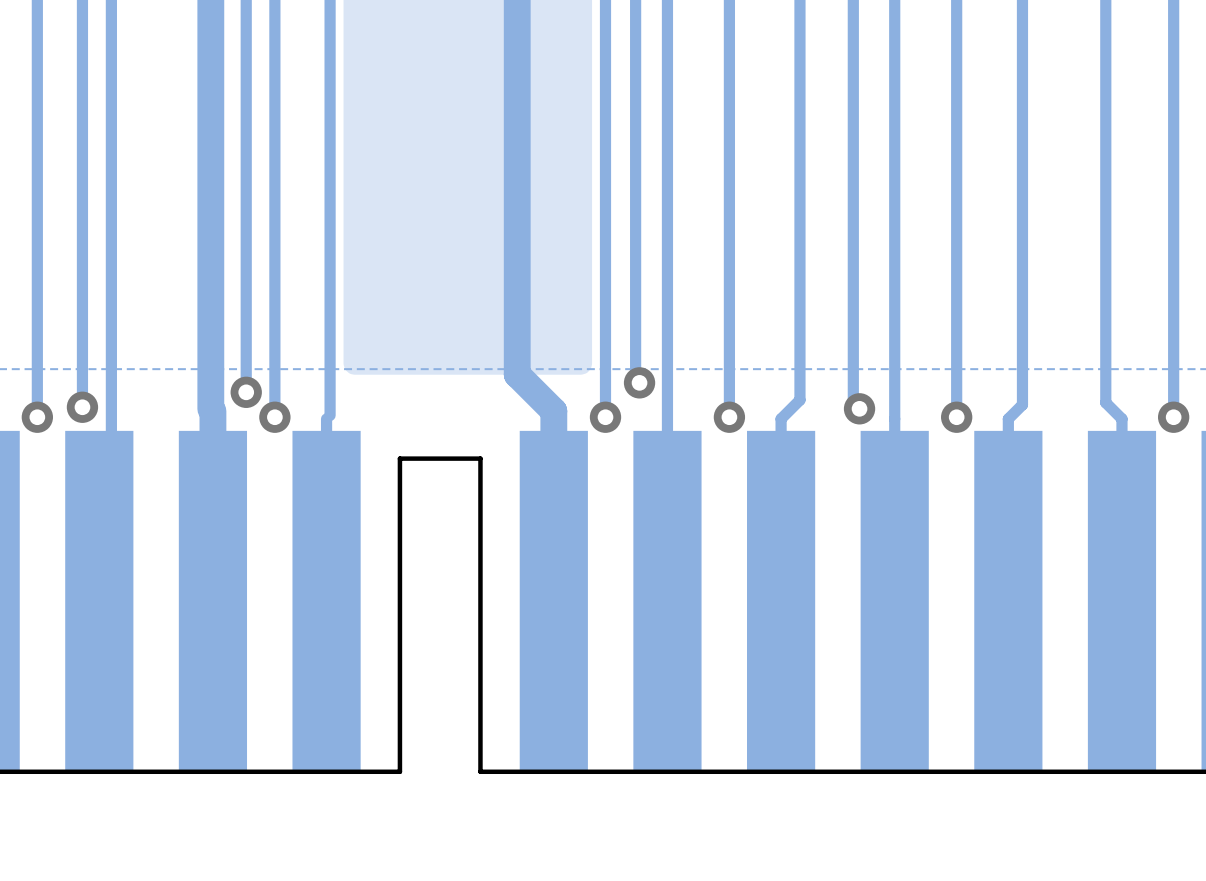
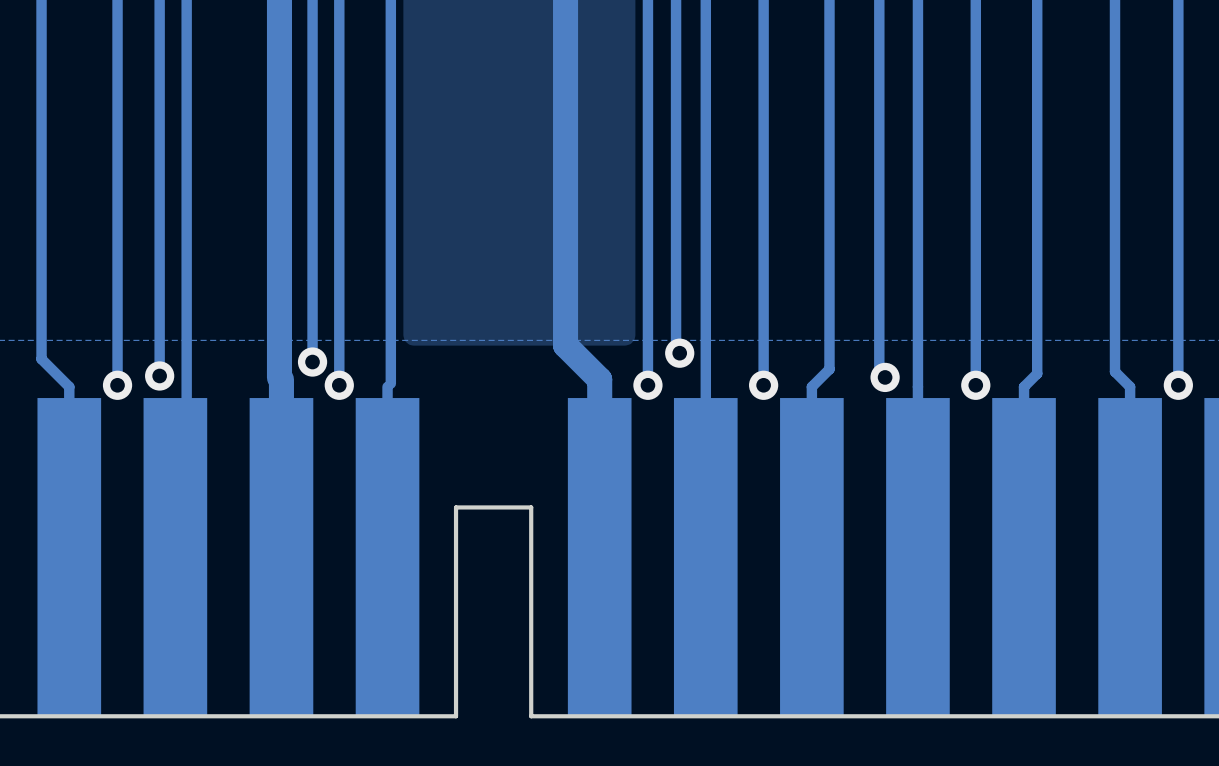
board edge: (480, 548) (480, 458) (399, 458) (399, 548) -> (531, 507) (456, 507)

